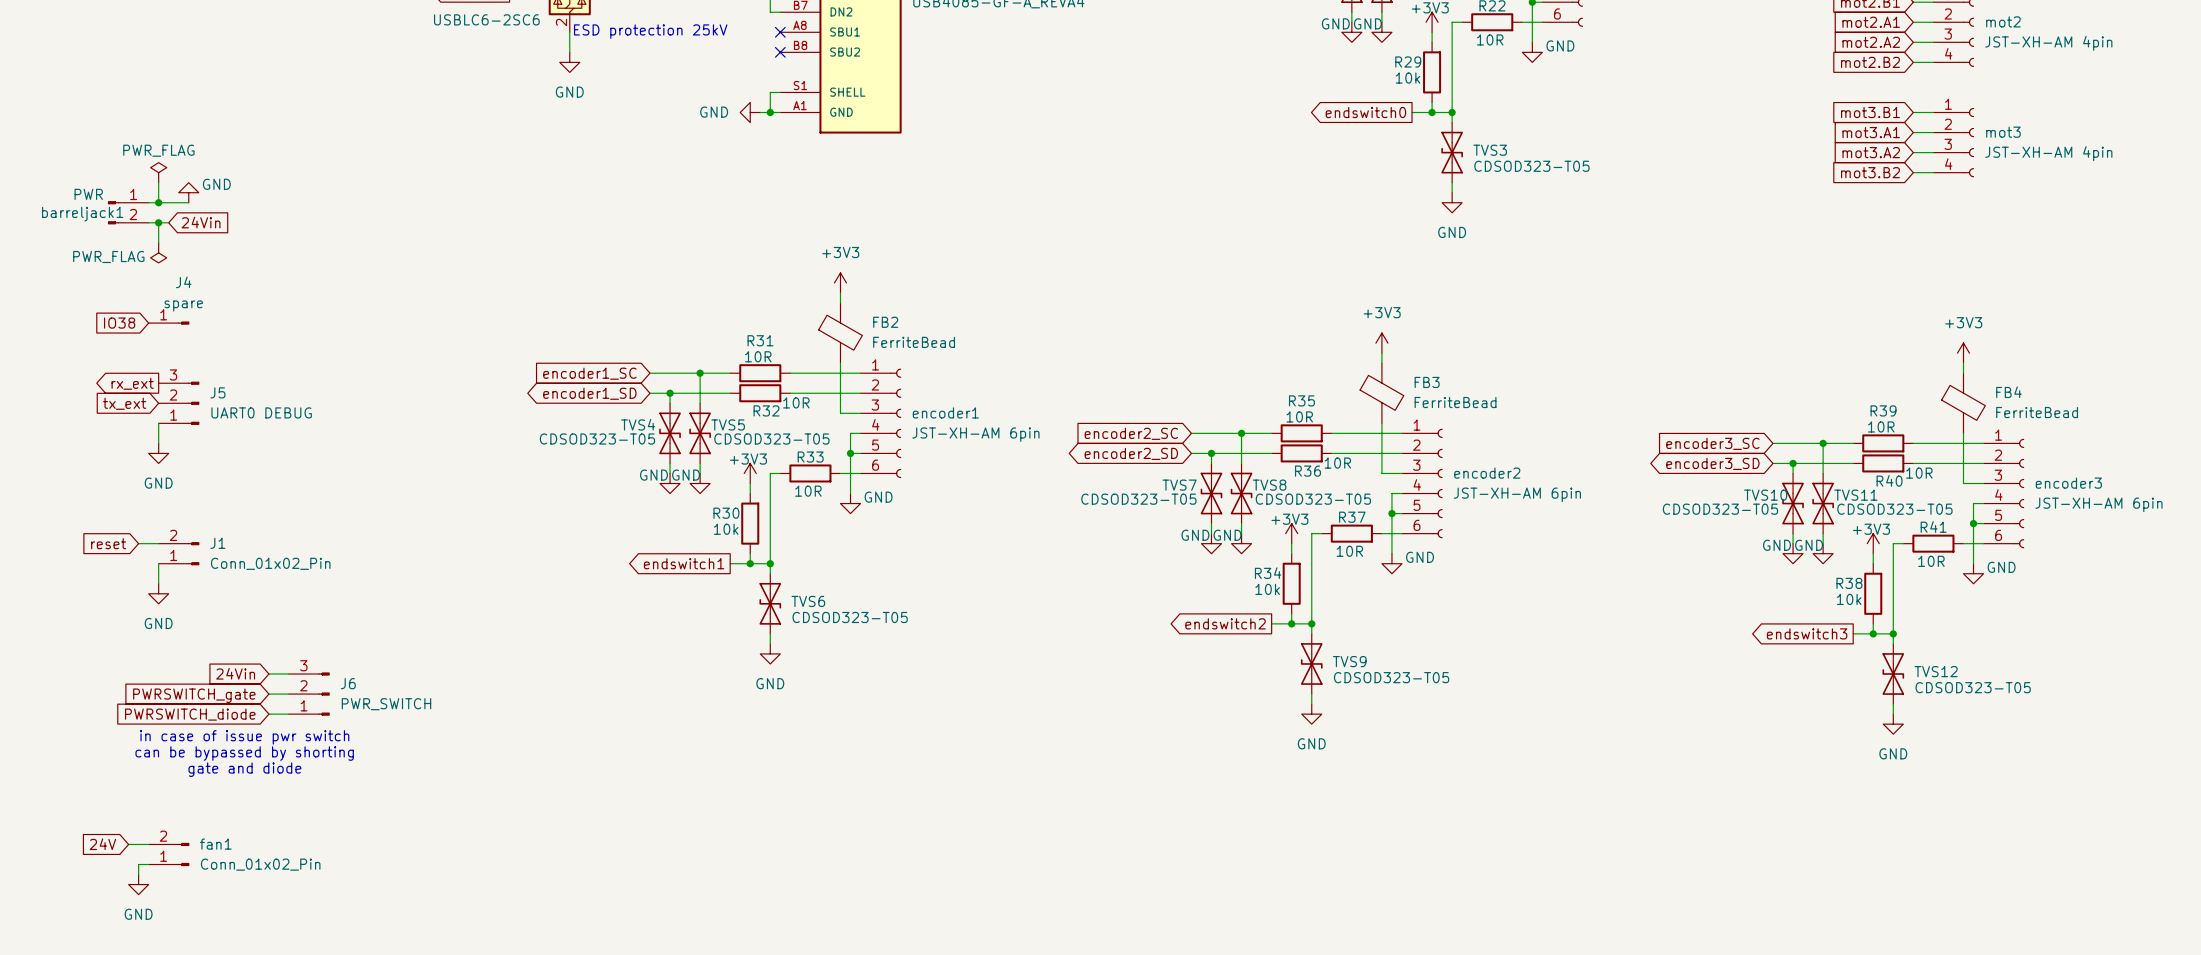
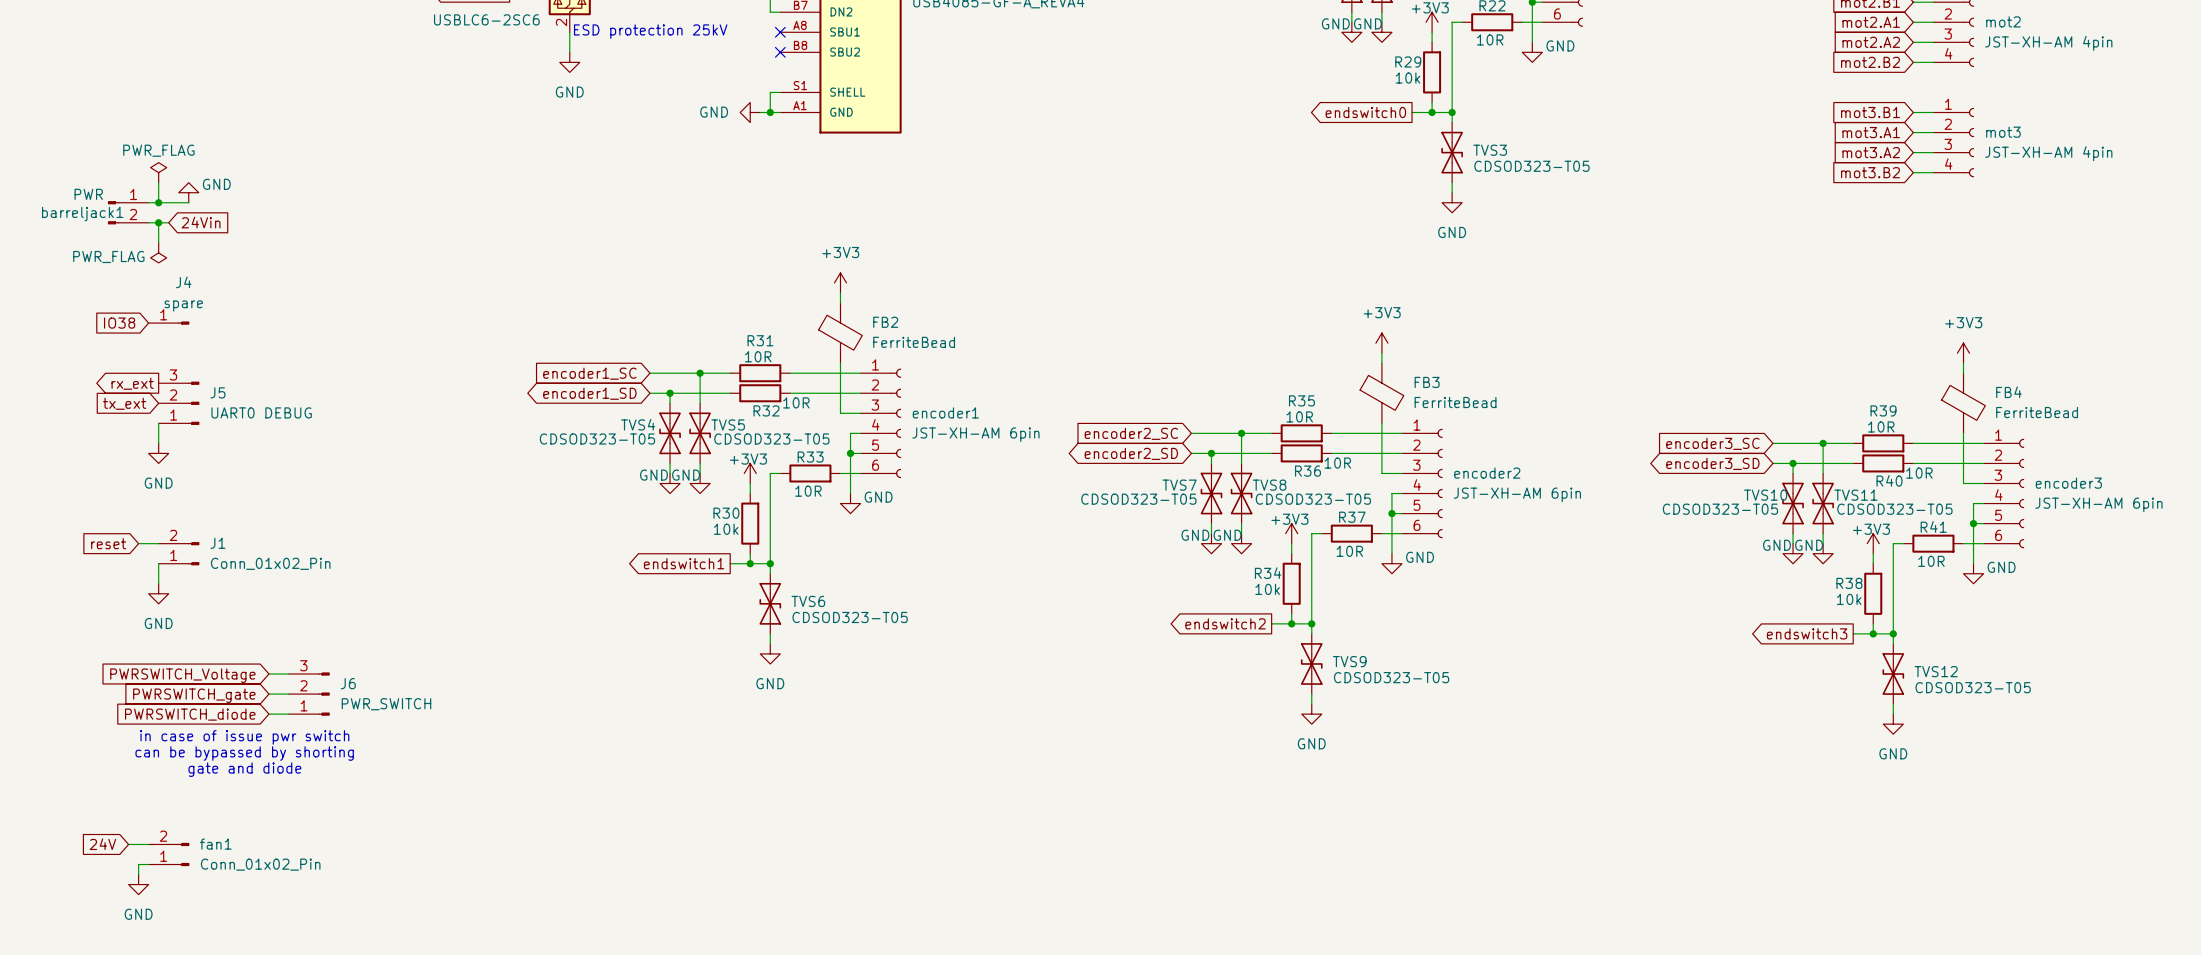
global label: 24Vin (235, 673) -> PWRSWITCH_Voltage (182, 675)

